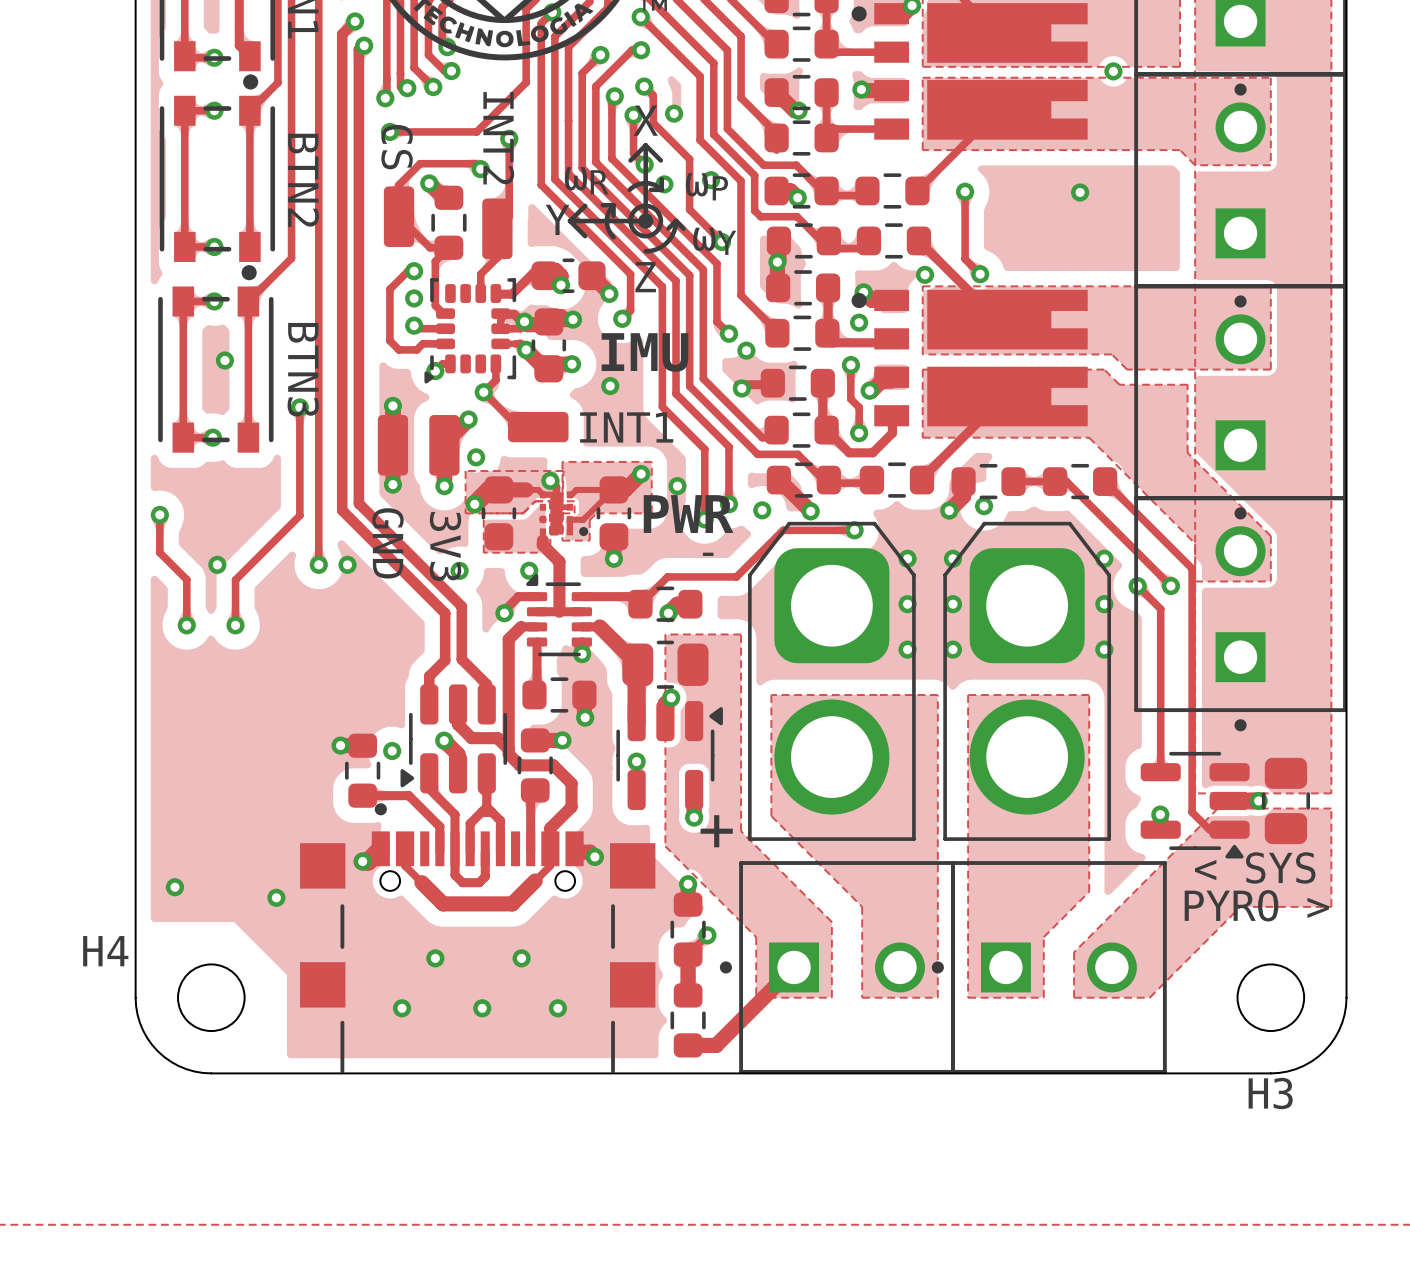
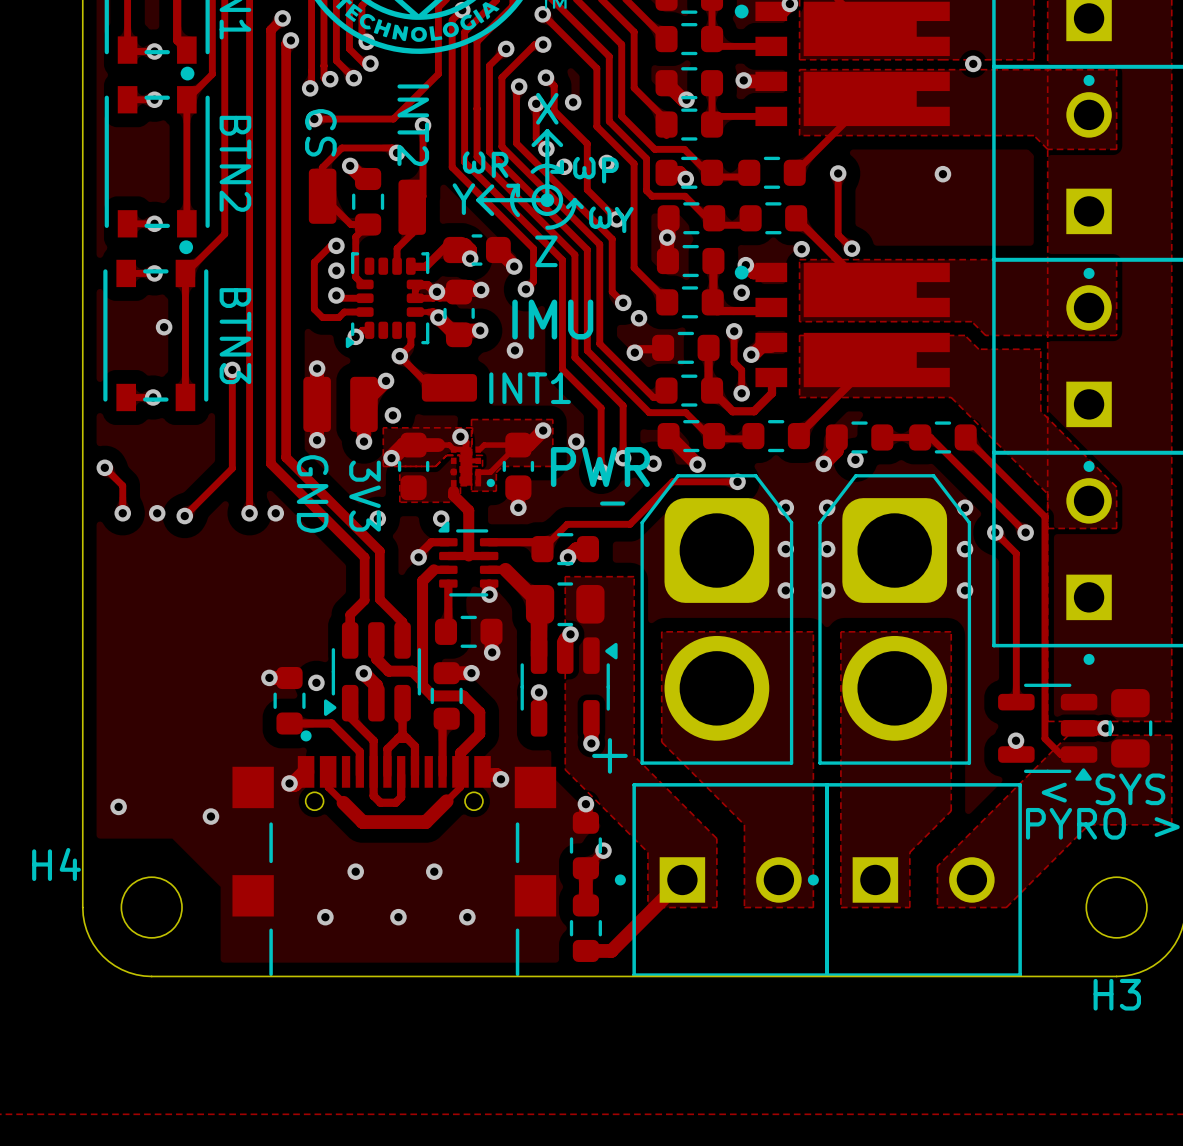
track: (184, 110) (184, 246) -> none
track: (183, 301) (183, 437) -> none
track: (159, 514) (159, 552) (186, 579) (186, 625) -> (104, 467) (122, 485) (122, 513)
via: none -> (122, 513)
track: (247, 567) (235, 579) (235, 625) -> none
via: none -> (184, 516)
via: (186, 625) -> none
via: (235, 625) -> none

